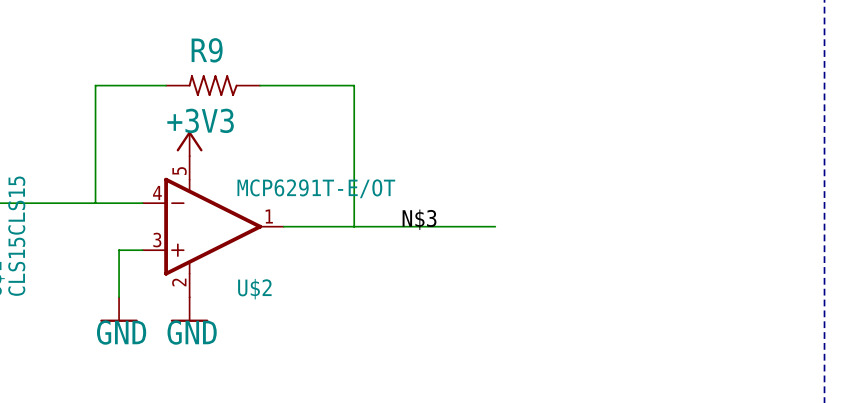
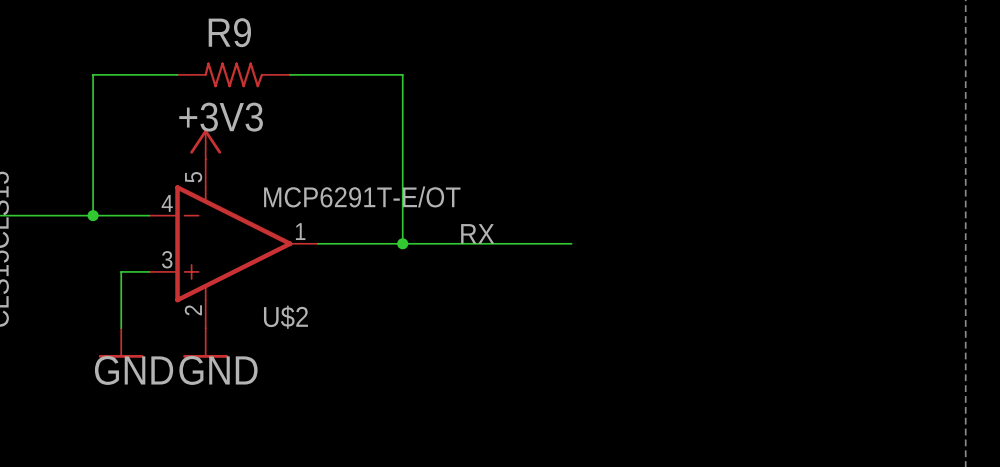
junction: none -> (93, 215)
label: N$3 (419, 219) -> RX (477, 233)
junction: none -> (402, 243)

